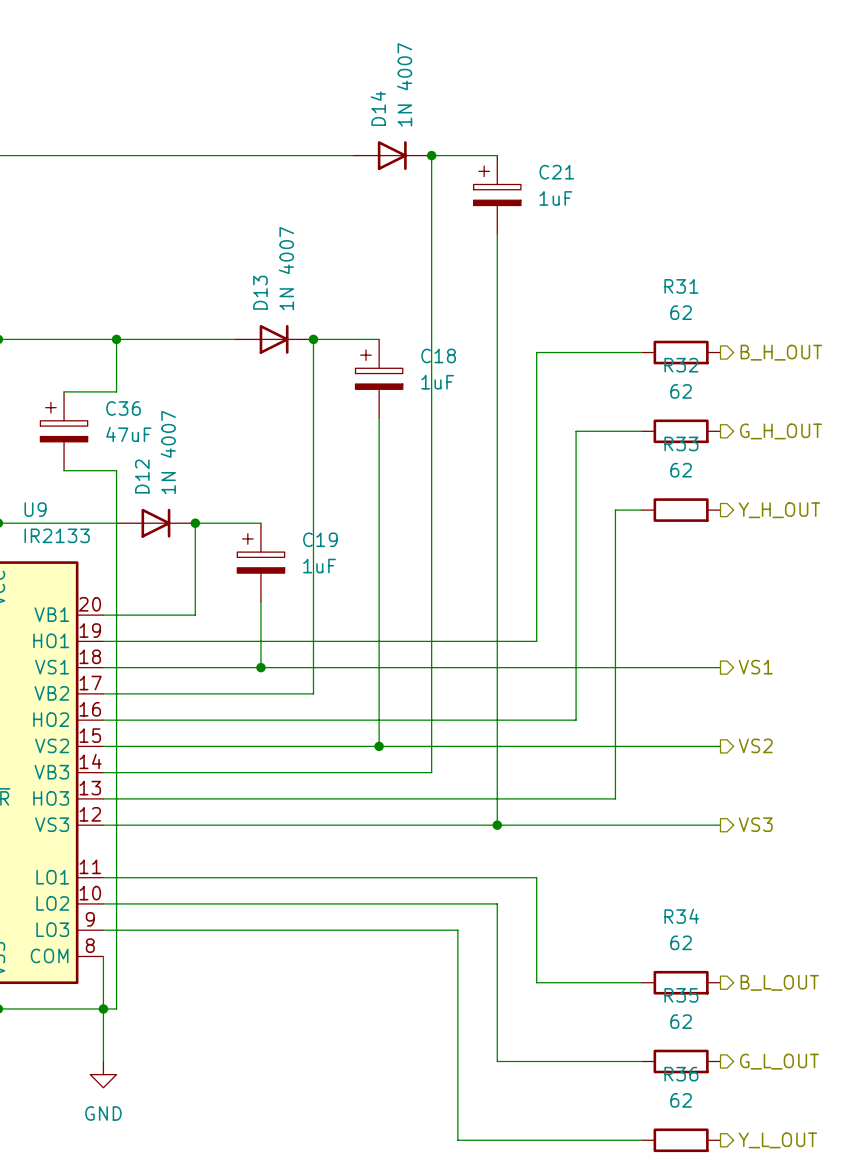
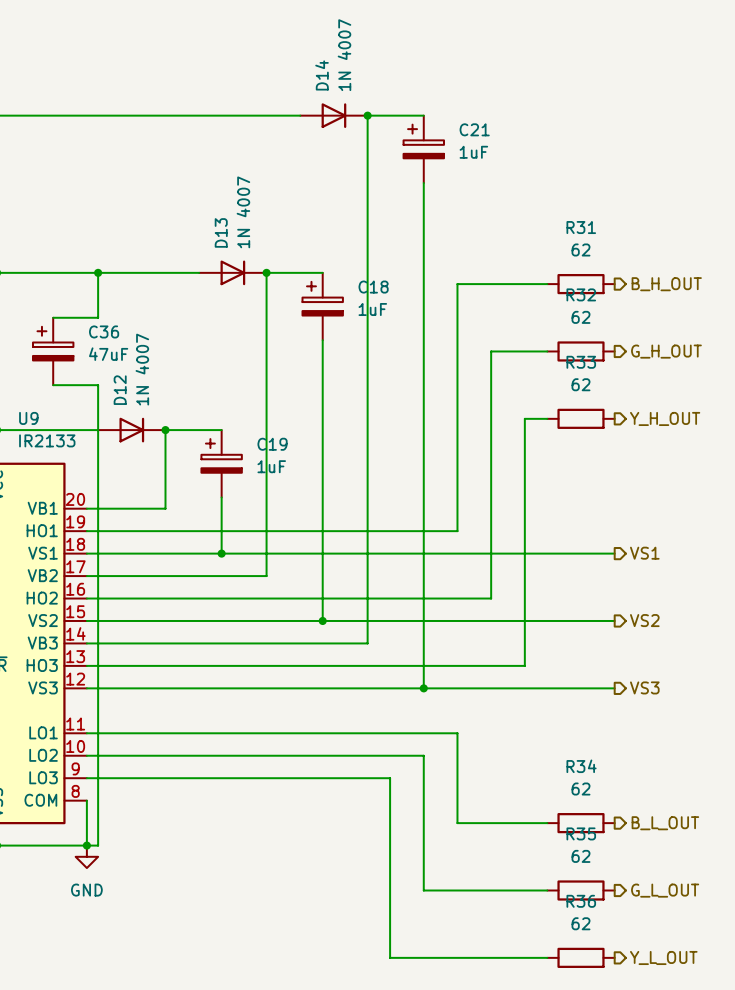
wire: (103, 1008) (103, 1061) -> none
power symbol position: GND (103, 1074) -> GND (86, 856)

